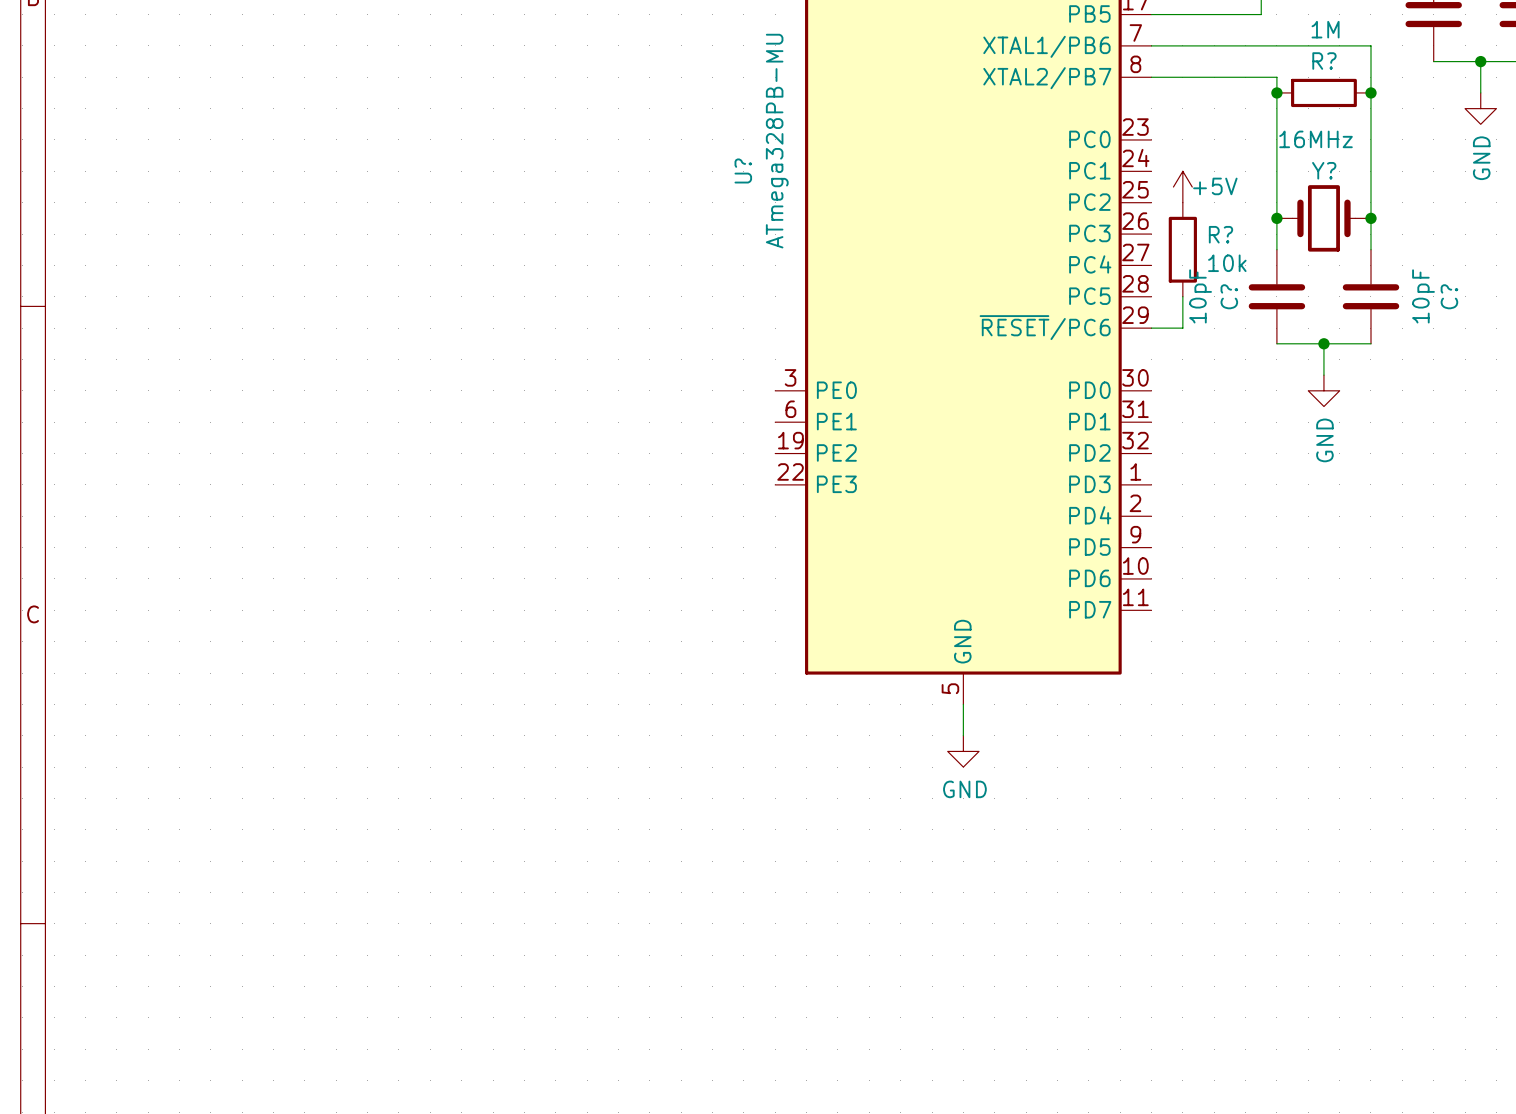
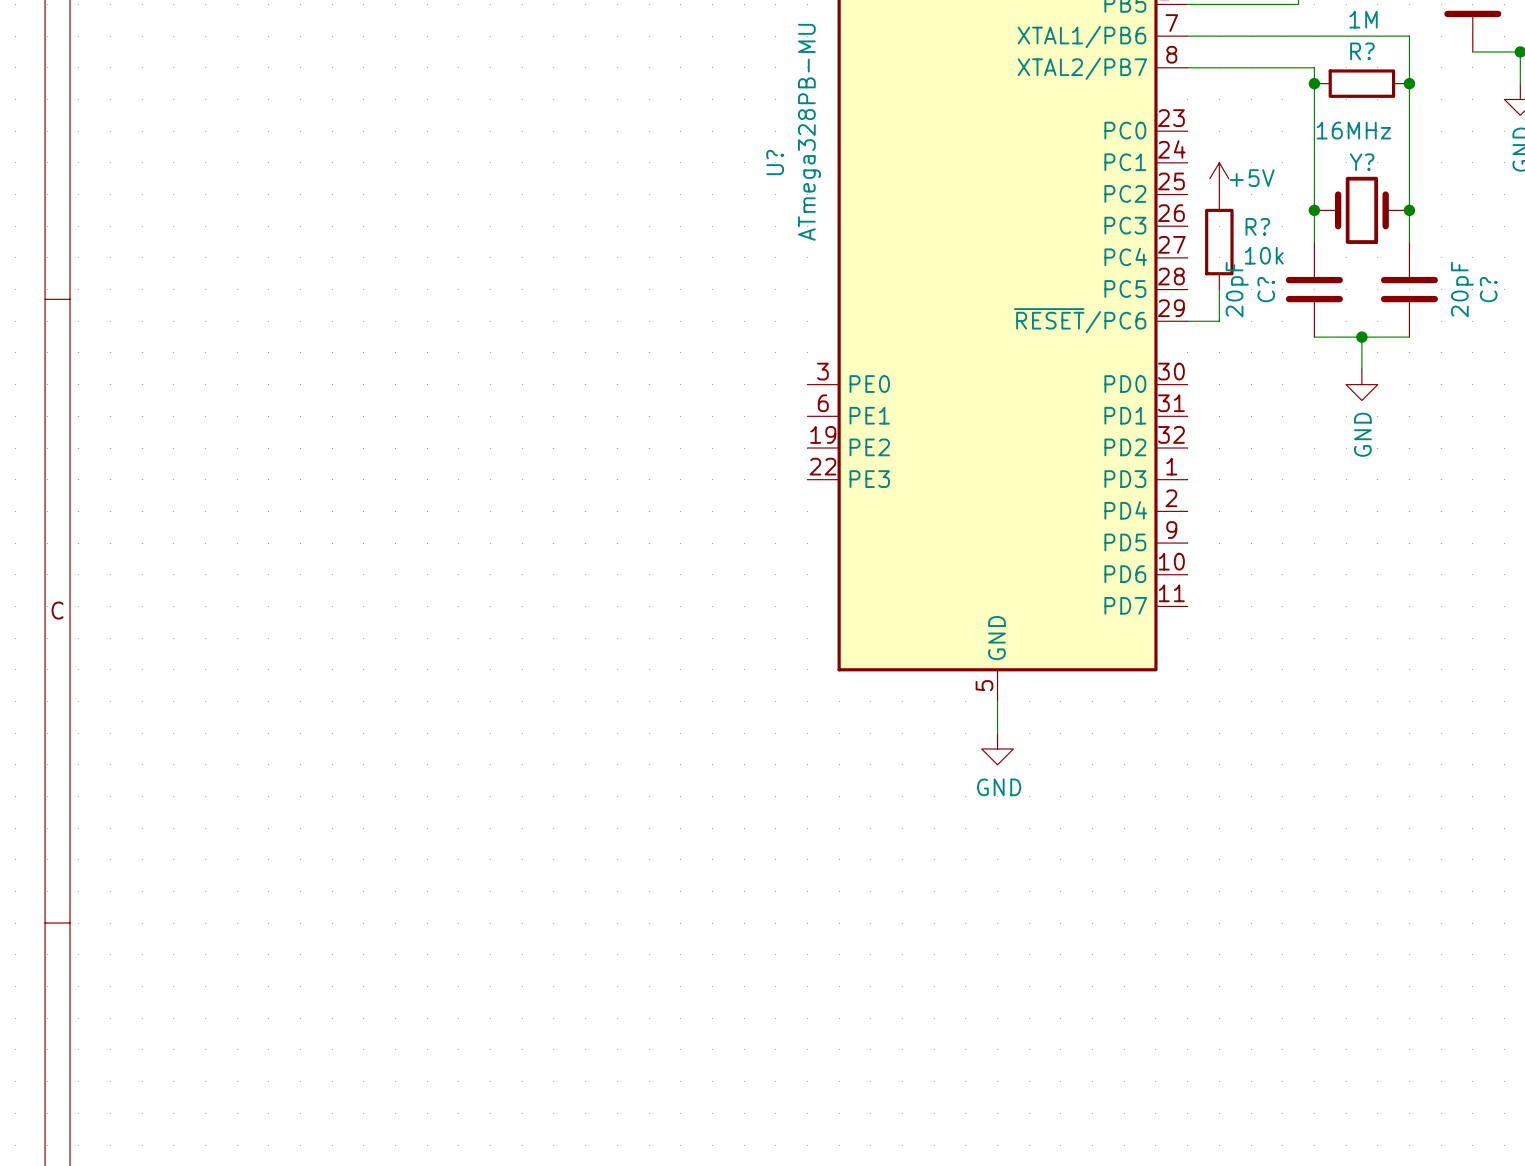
C? value: 10pF (1200, 296) -> 20pF (1237, 289)
C? value: 10pF (1423, 296) -> 20pF (1462, 289)

